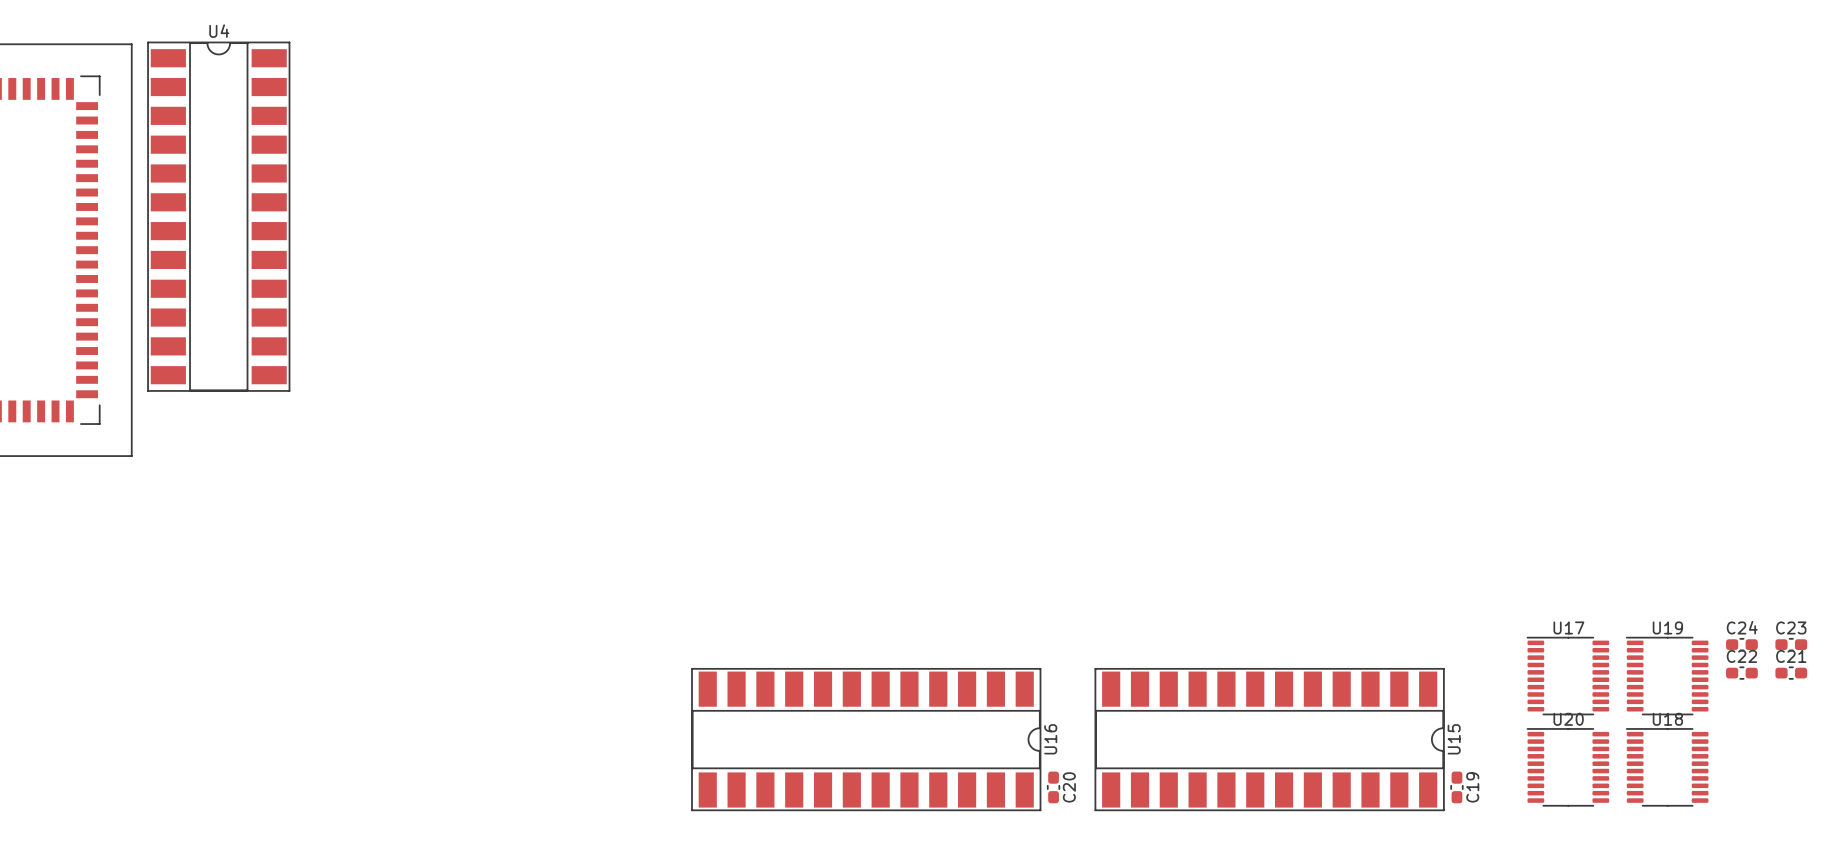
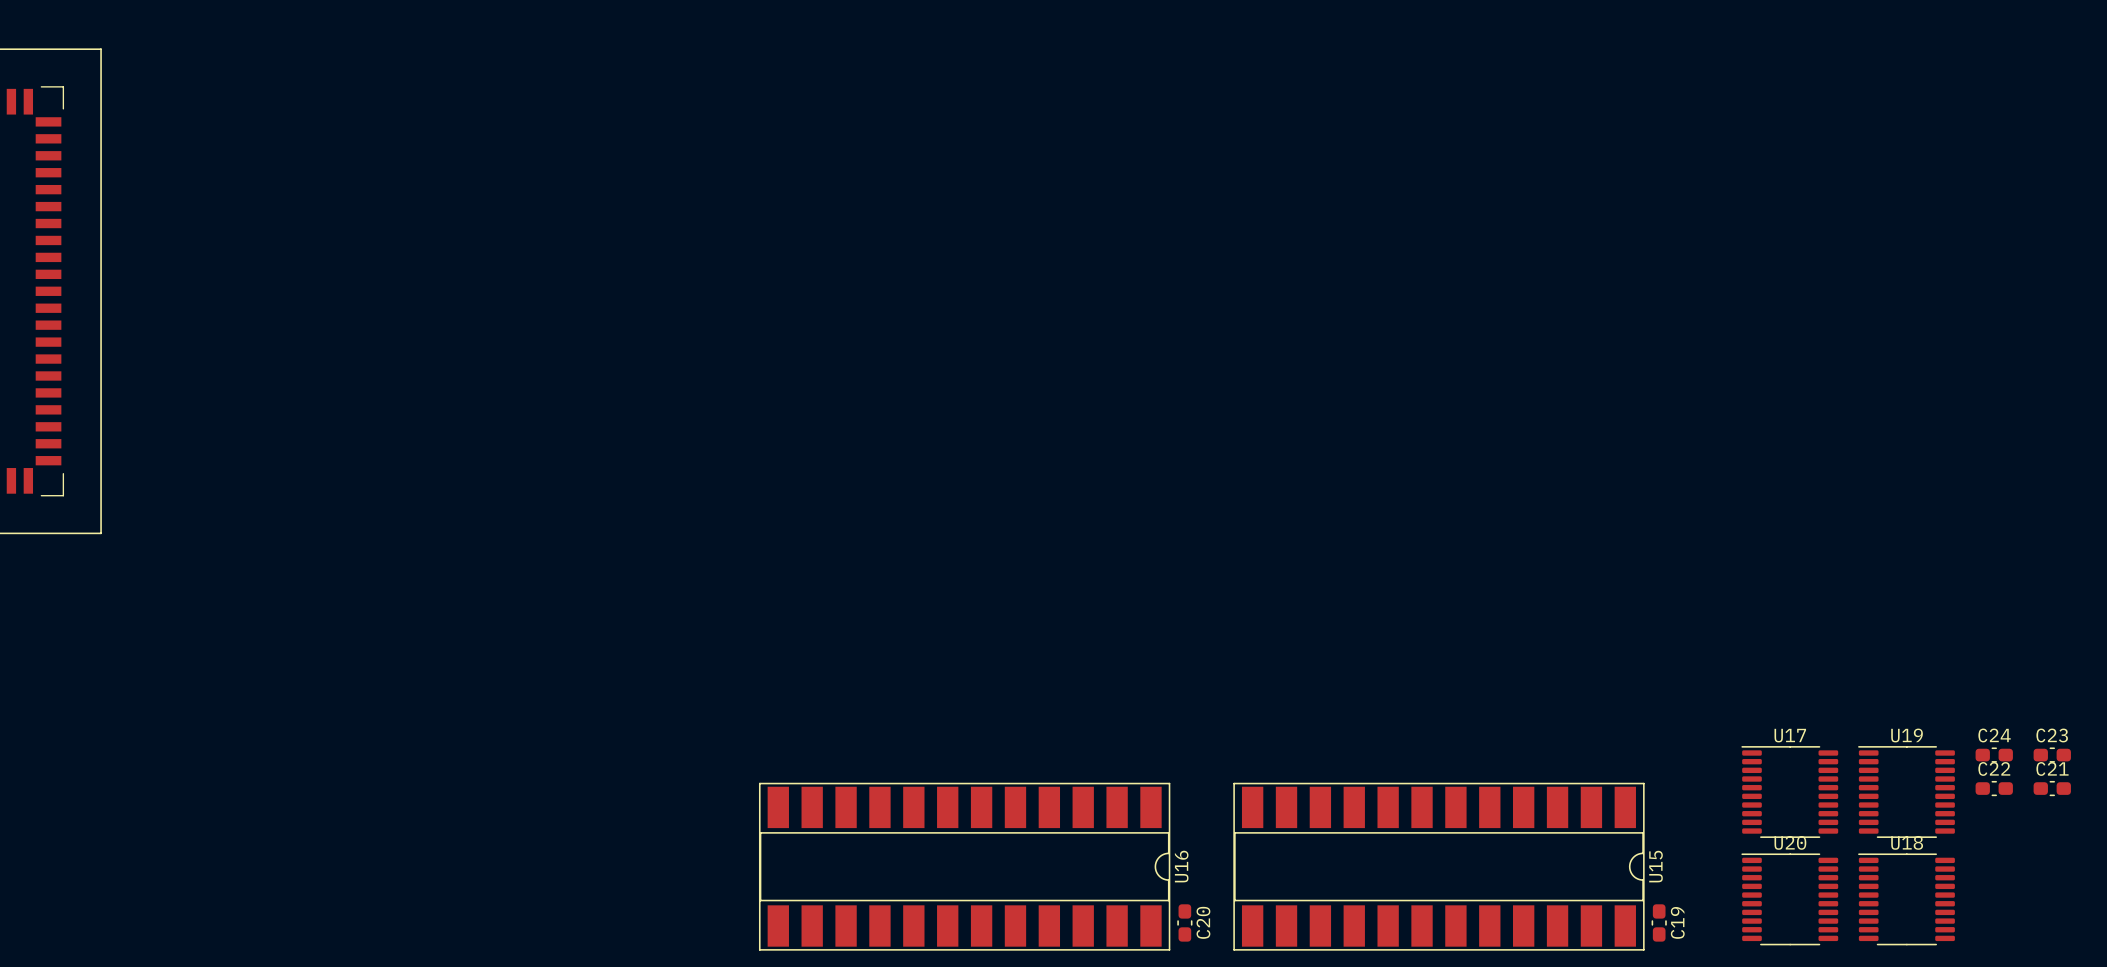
U4: (218, 216) -> none

